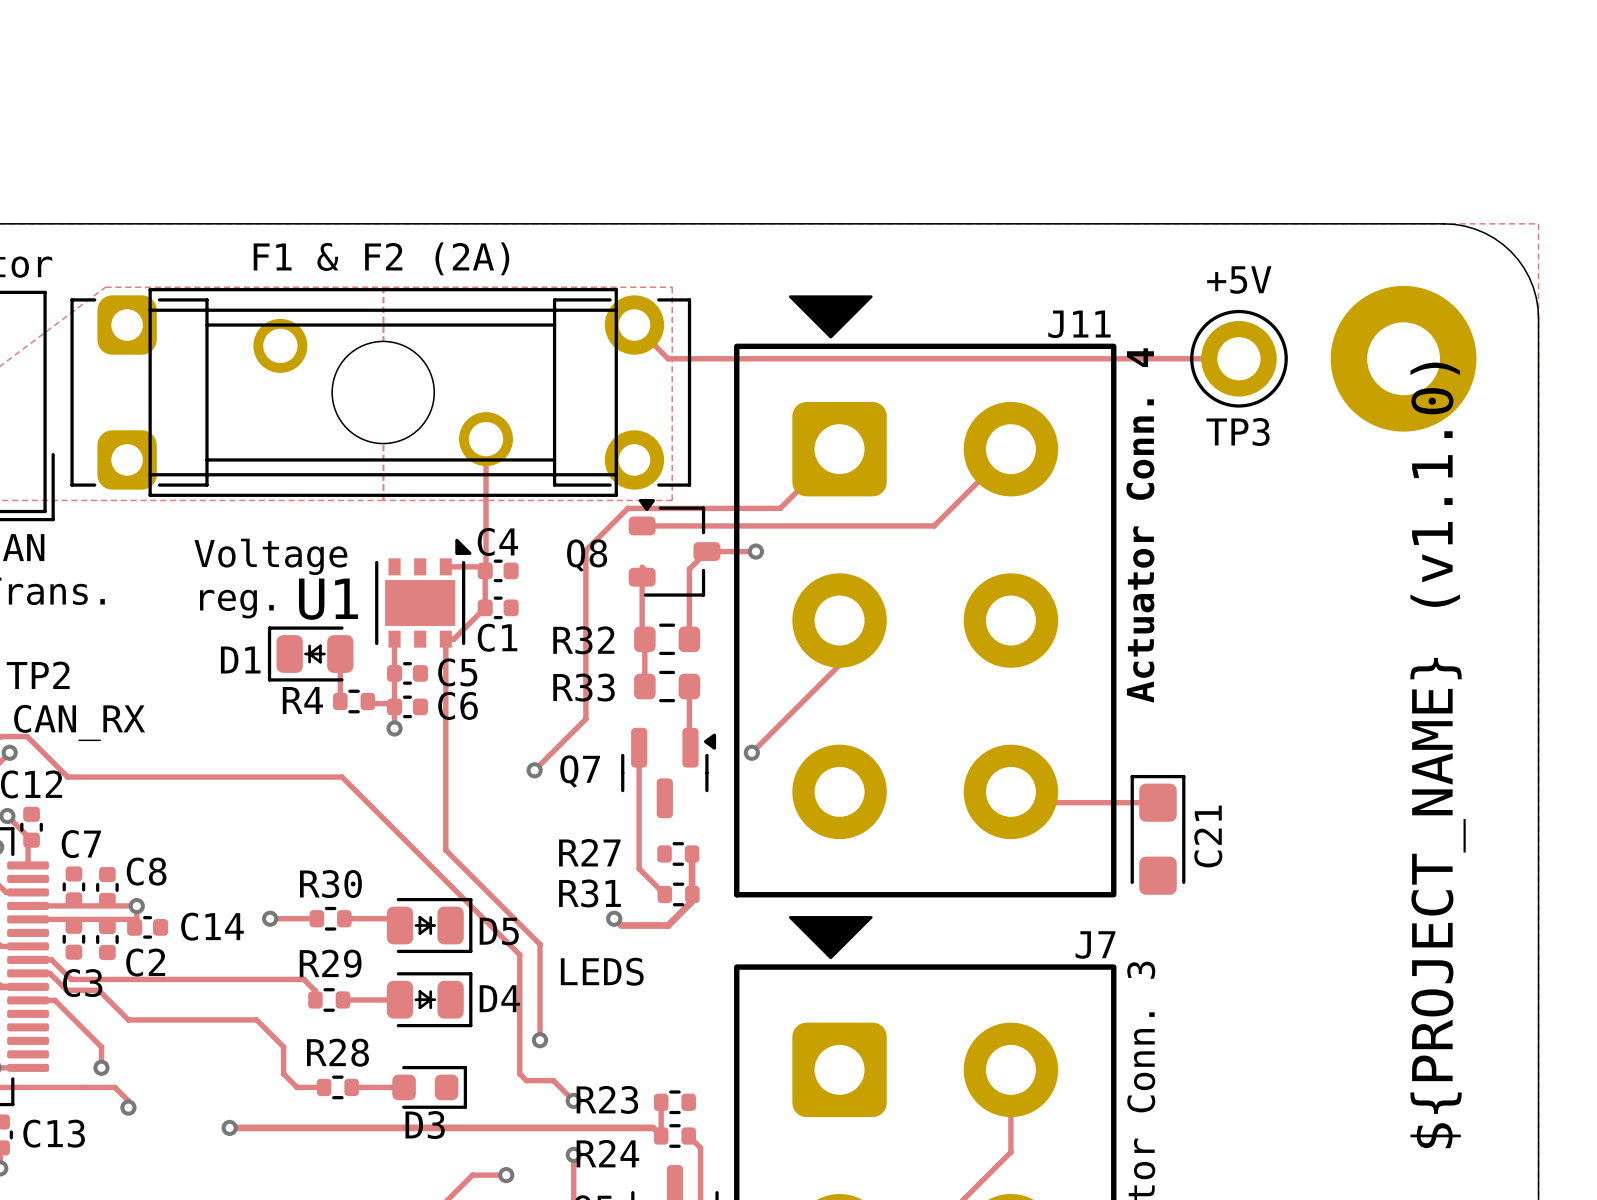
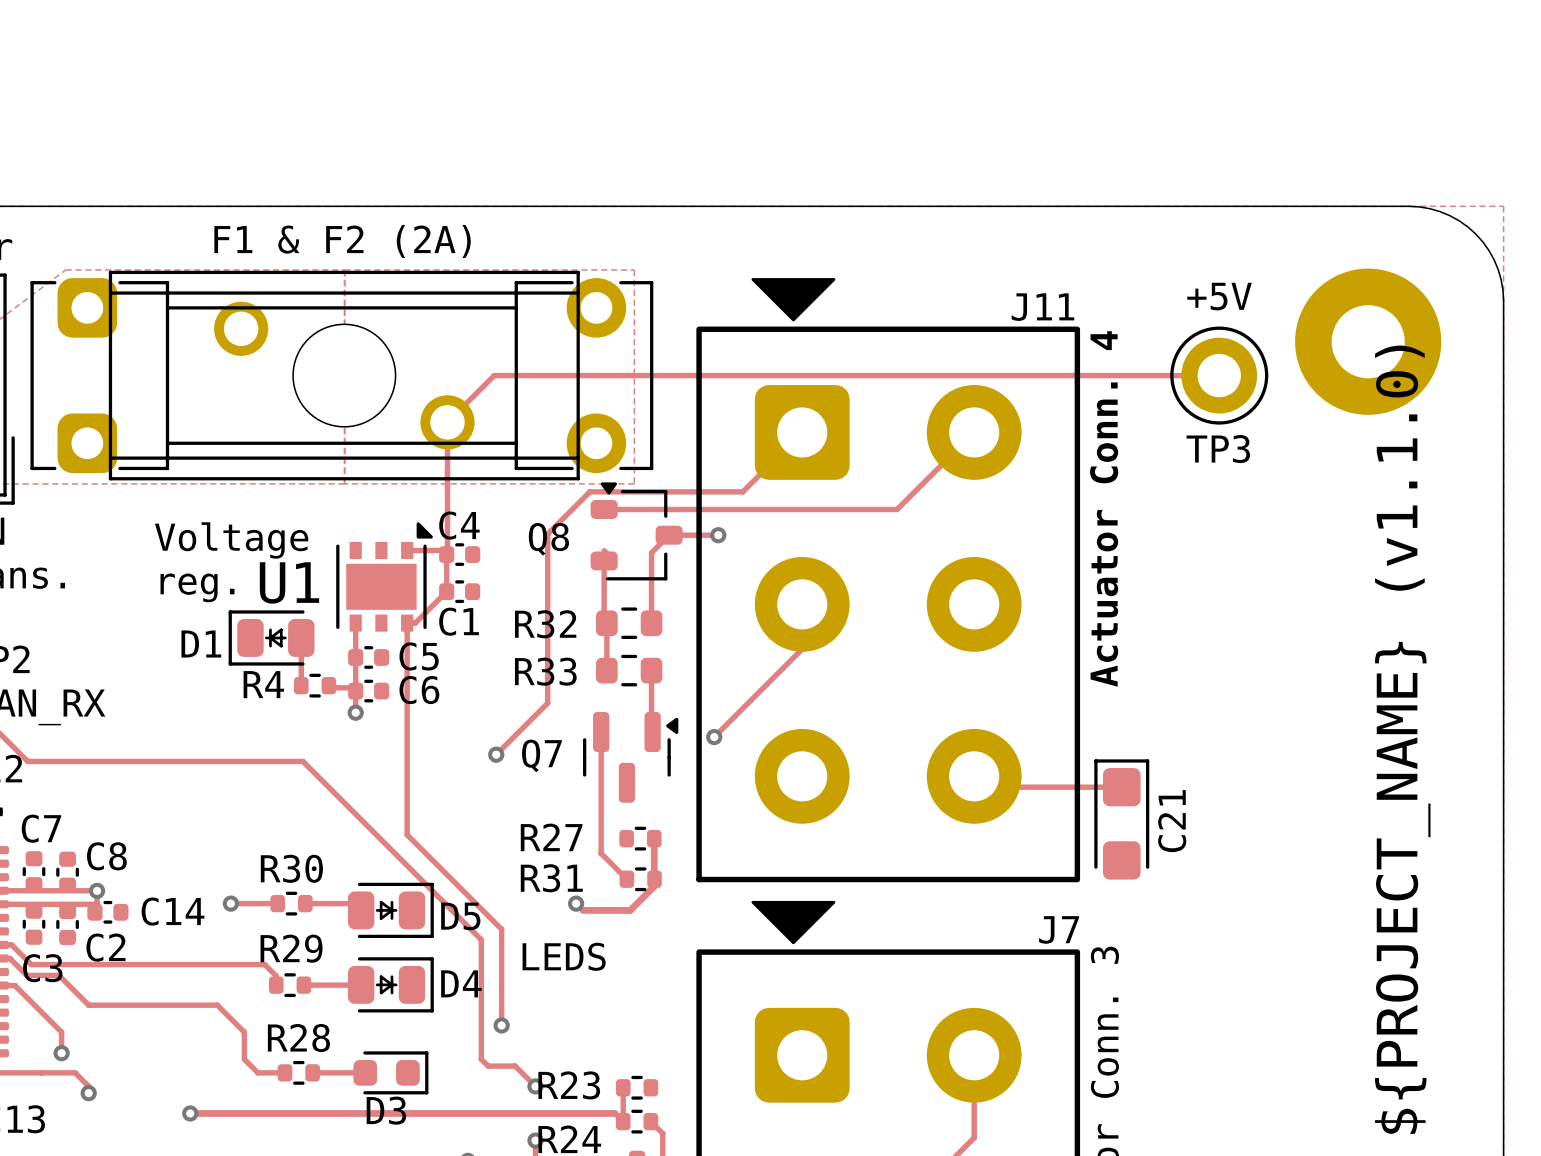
track: (634, 325) (668, 358) (1238, 358) -> none
TP3 position: (1238, 358) -> (1219, 375)
track: none -> (1219, 375) (494, 375) (447, 422)

